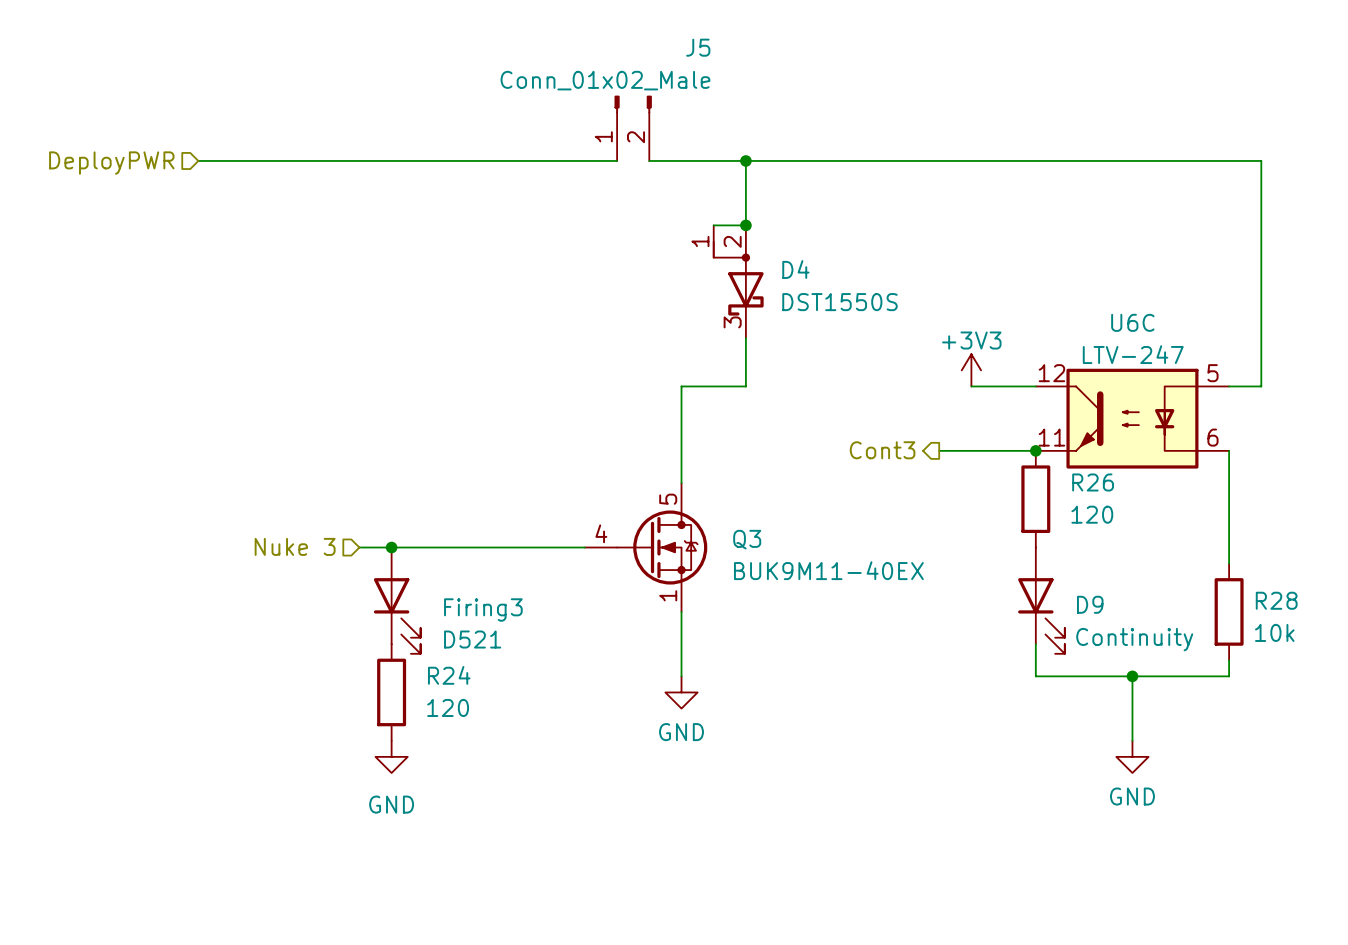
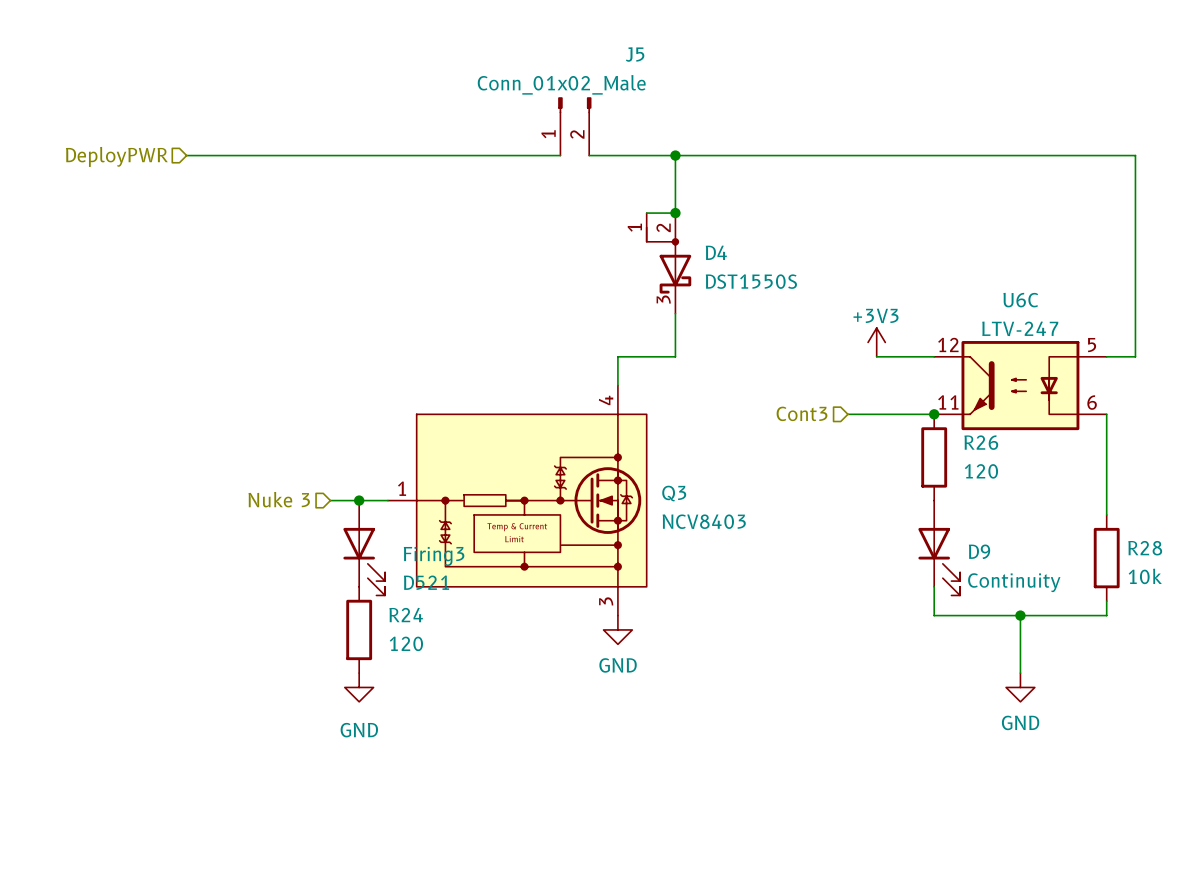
hierarchical label shape: output (882, 450) -> input (802, 413)
Q3 symbol: [584, 483, 708, 612] -> [387, 385, 647, 616]
Q3 value: BUK9M11-40EX (828, 570) -> NCV8403 (704, 521)

